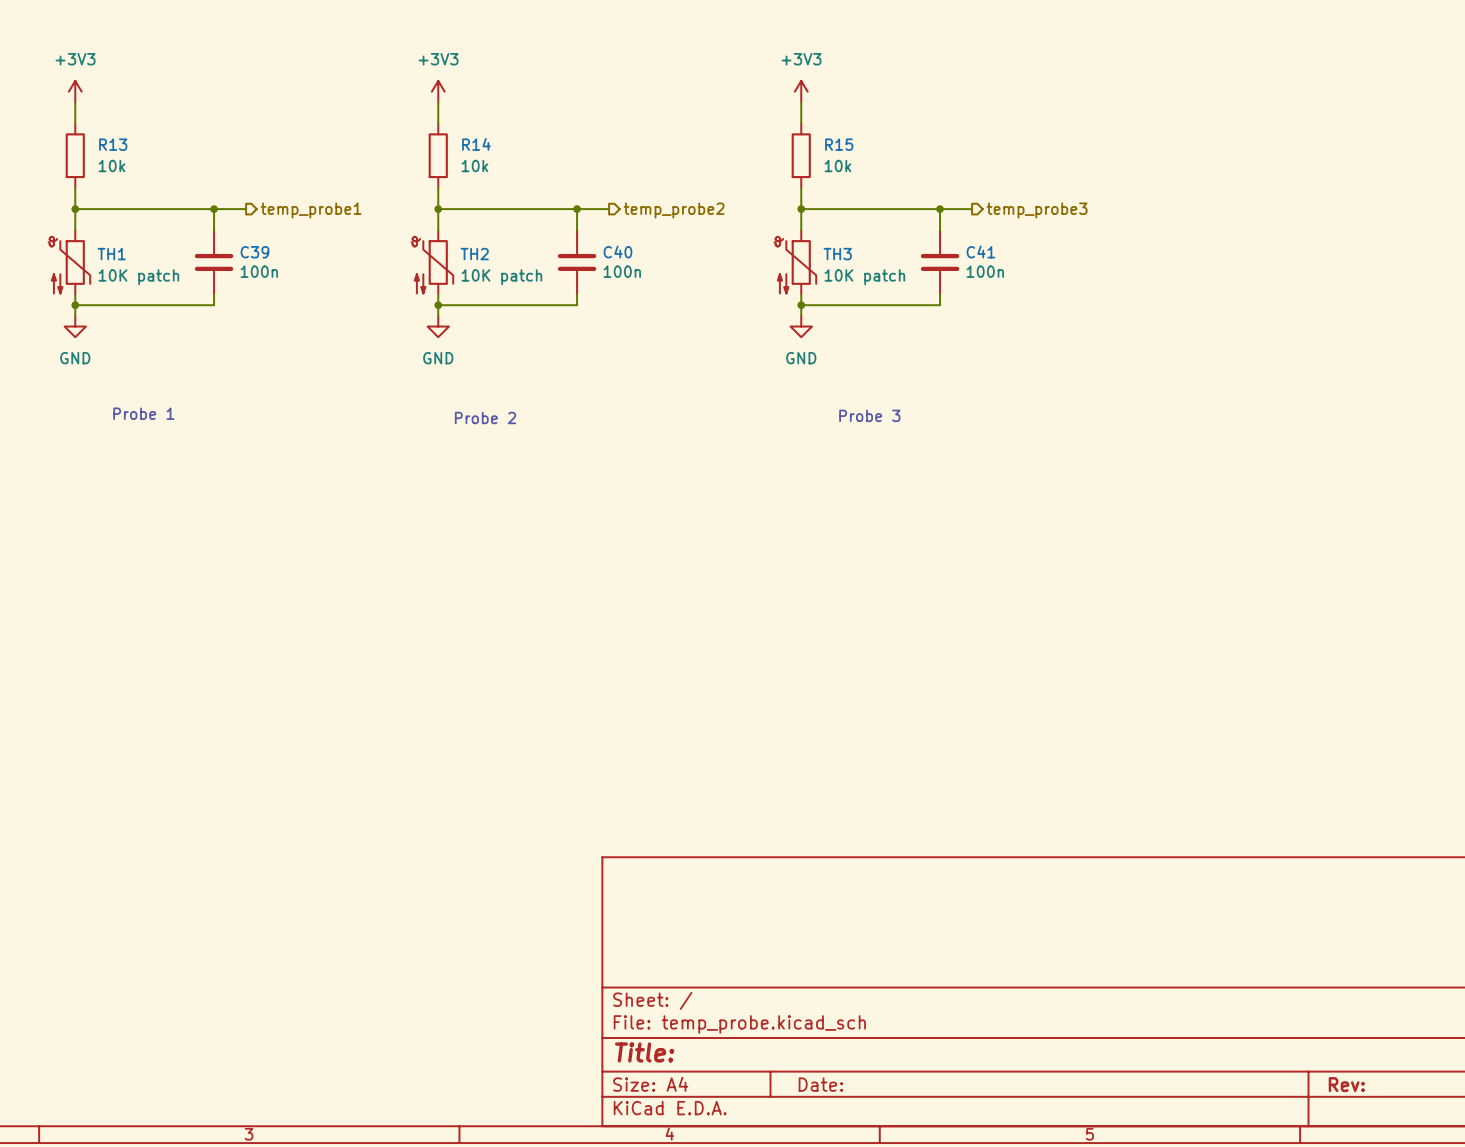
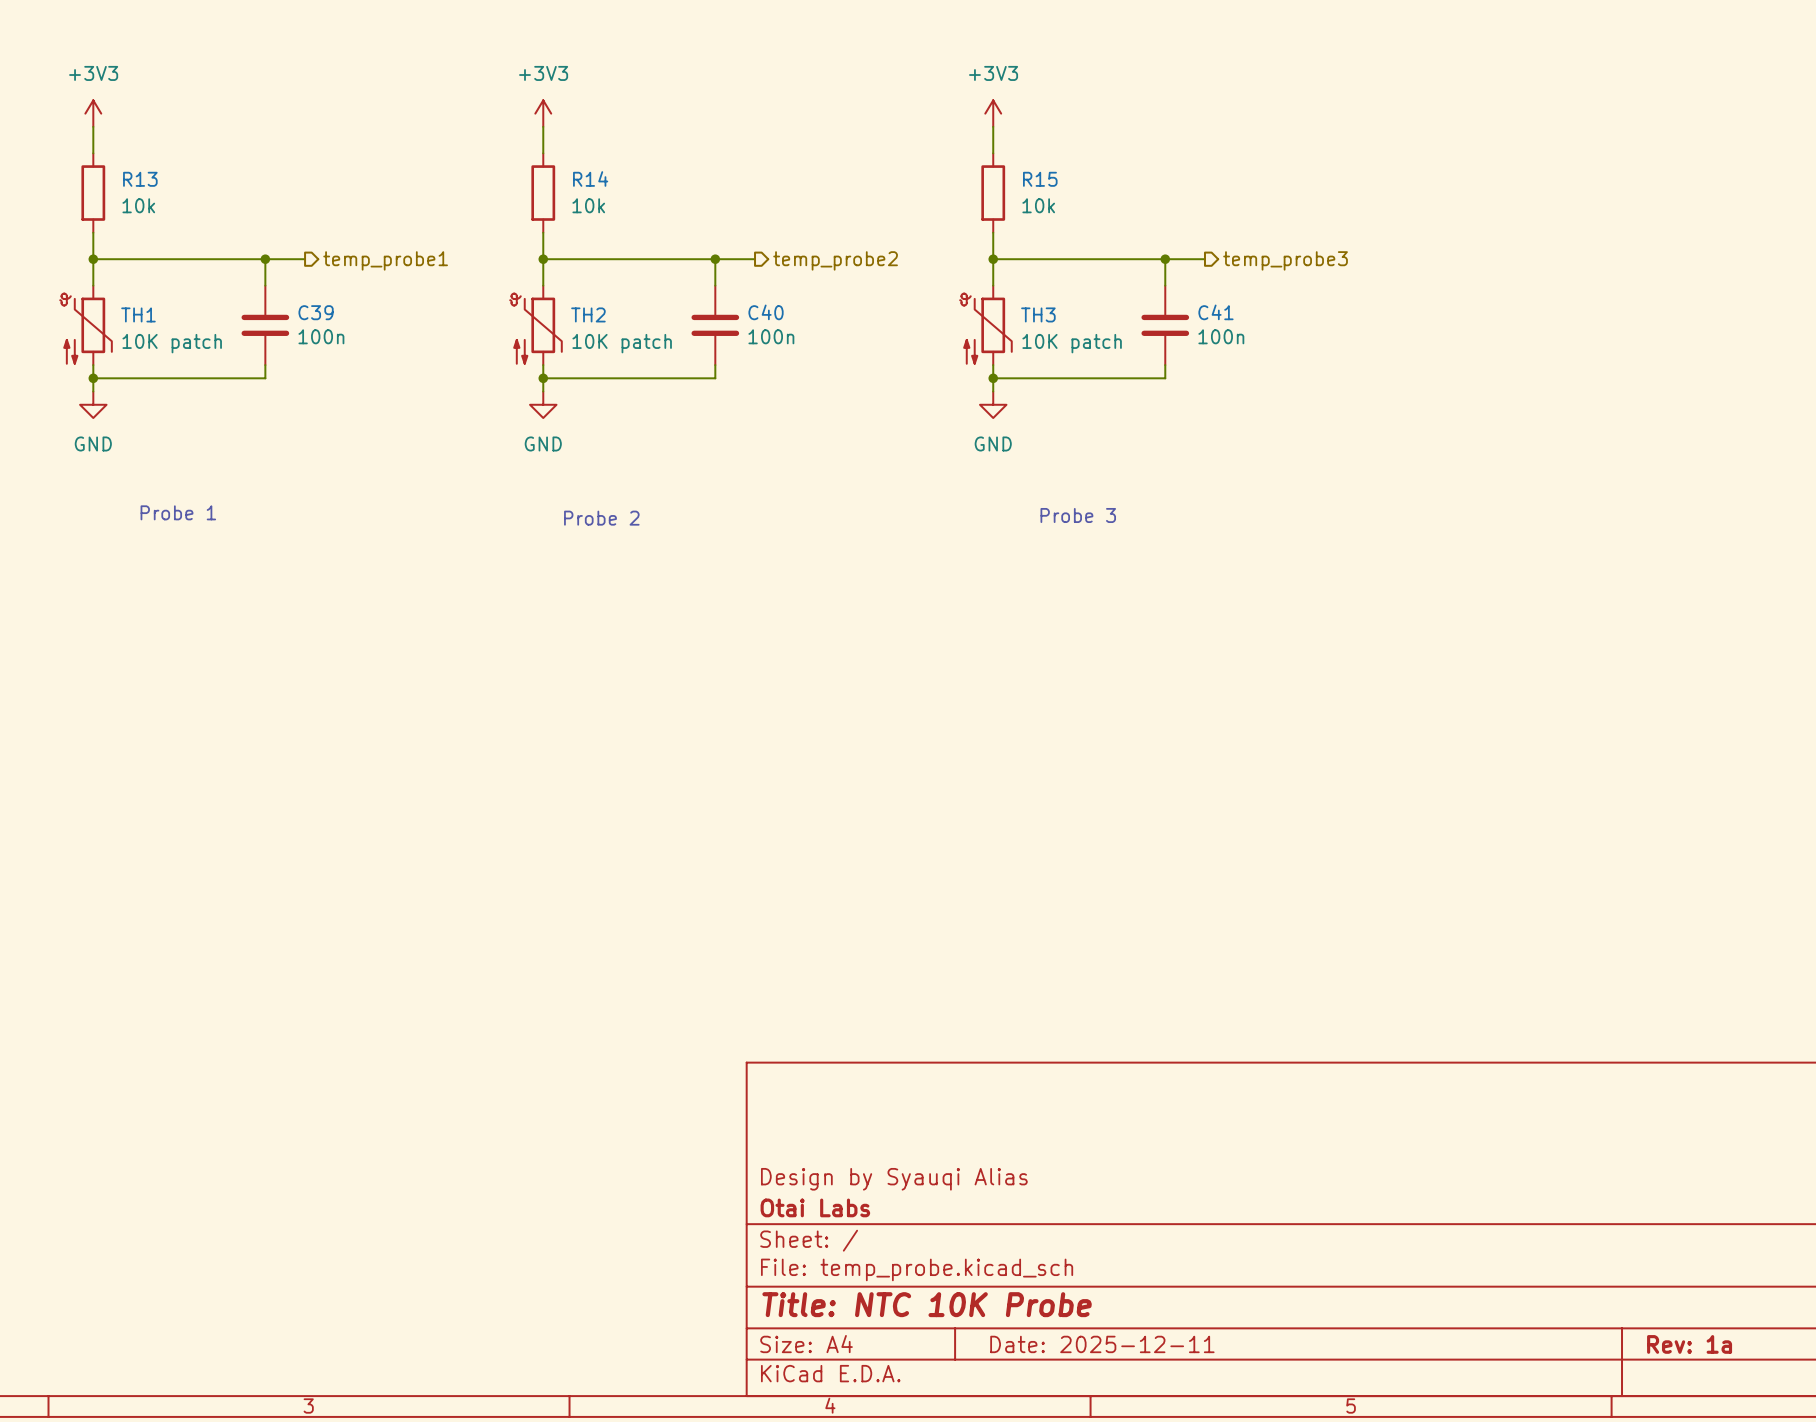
title block: none -> Design by Syauqi Alias (894, 1179)
title block: none -> Otai Labs (815, 1207)
title block: Title: (644, 1052) -> Title: NTC 10K Probe (927, 1304)
title block: Date: (820, 1084) -> Date: 2025-12-11 (1102, 1344)
title block: Rev: (1346, 1084) -> Rev: 1a (1689, 1344)

